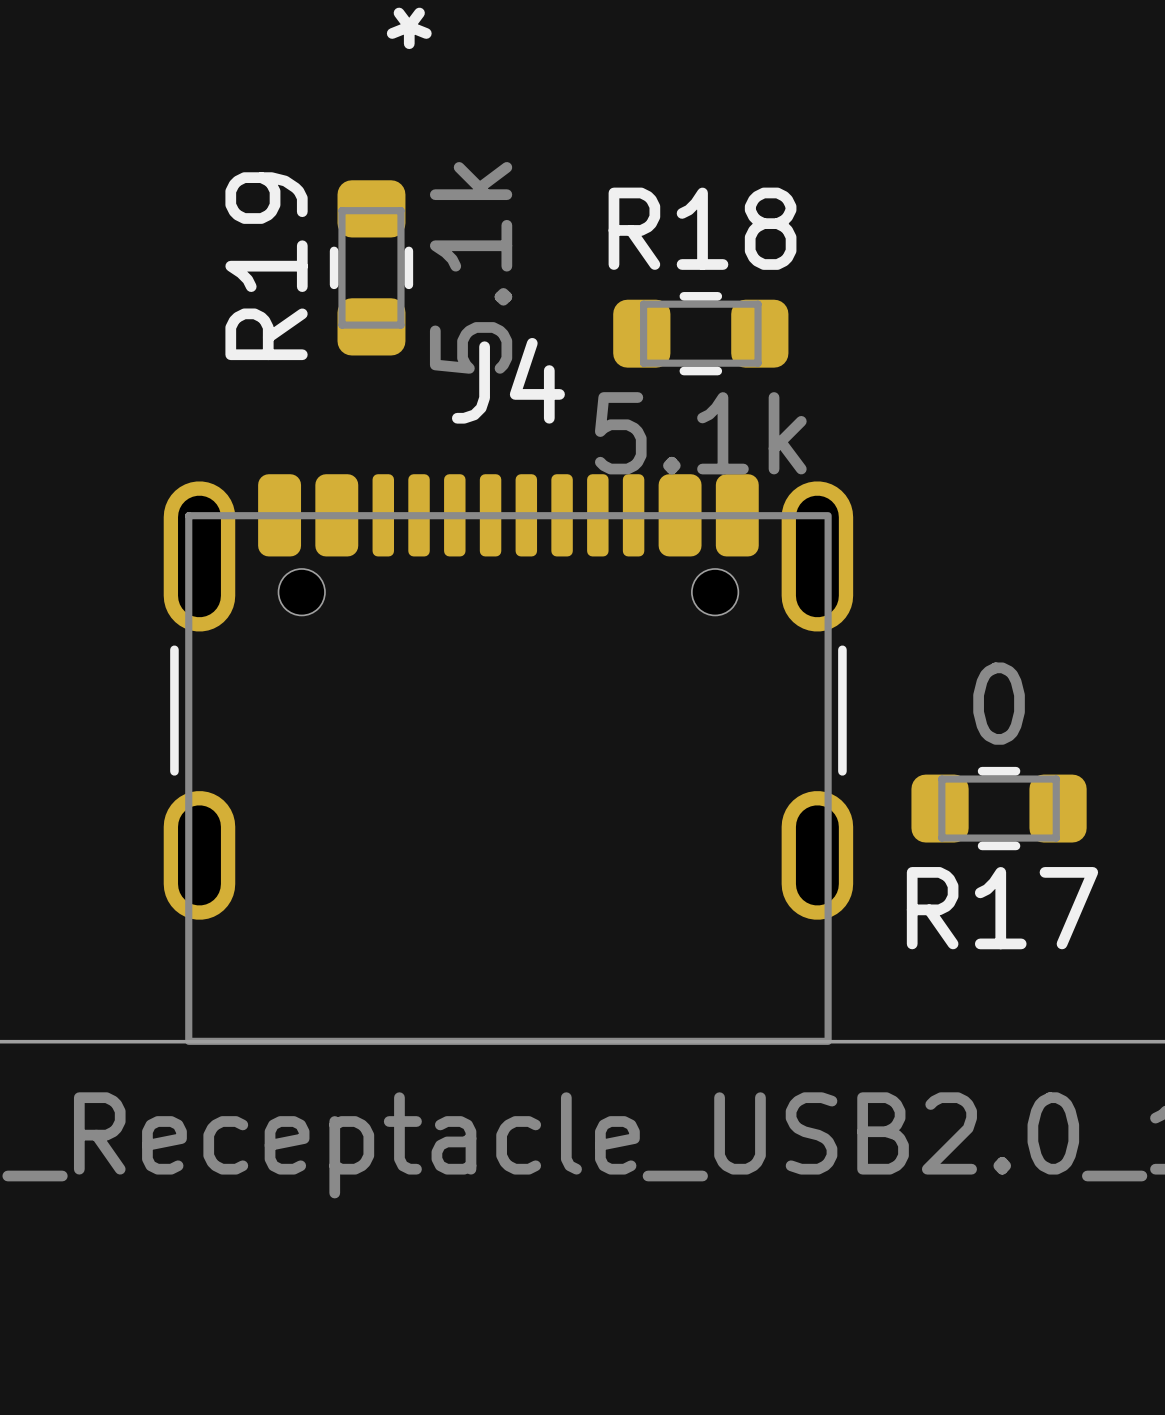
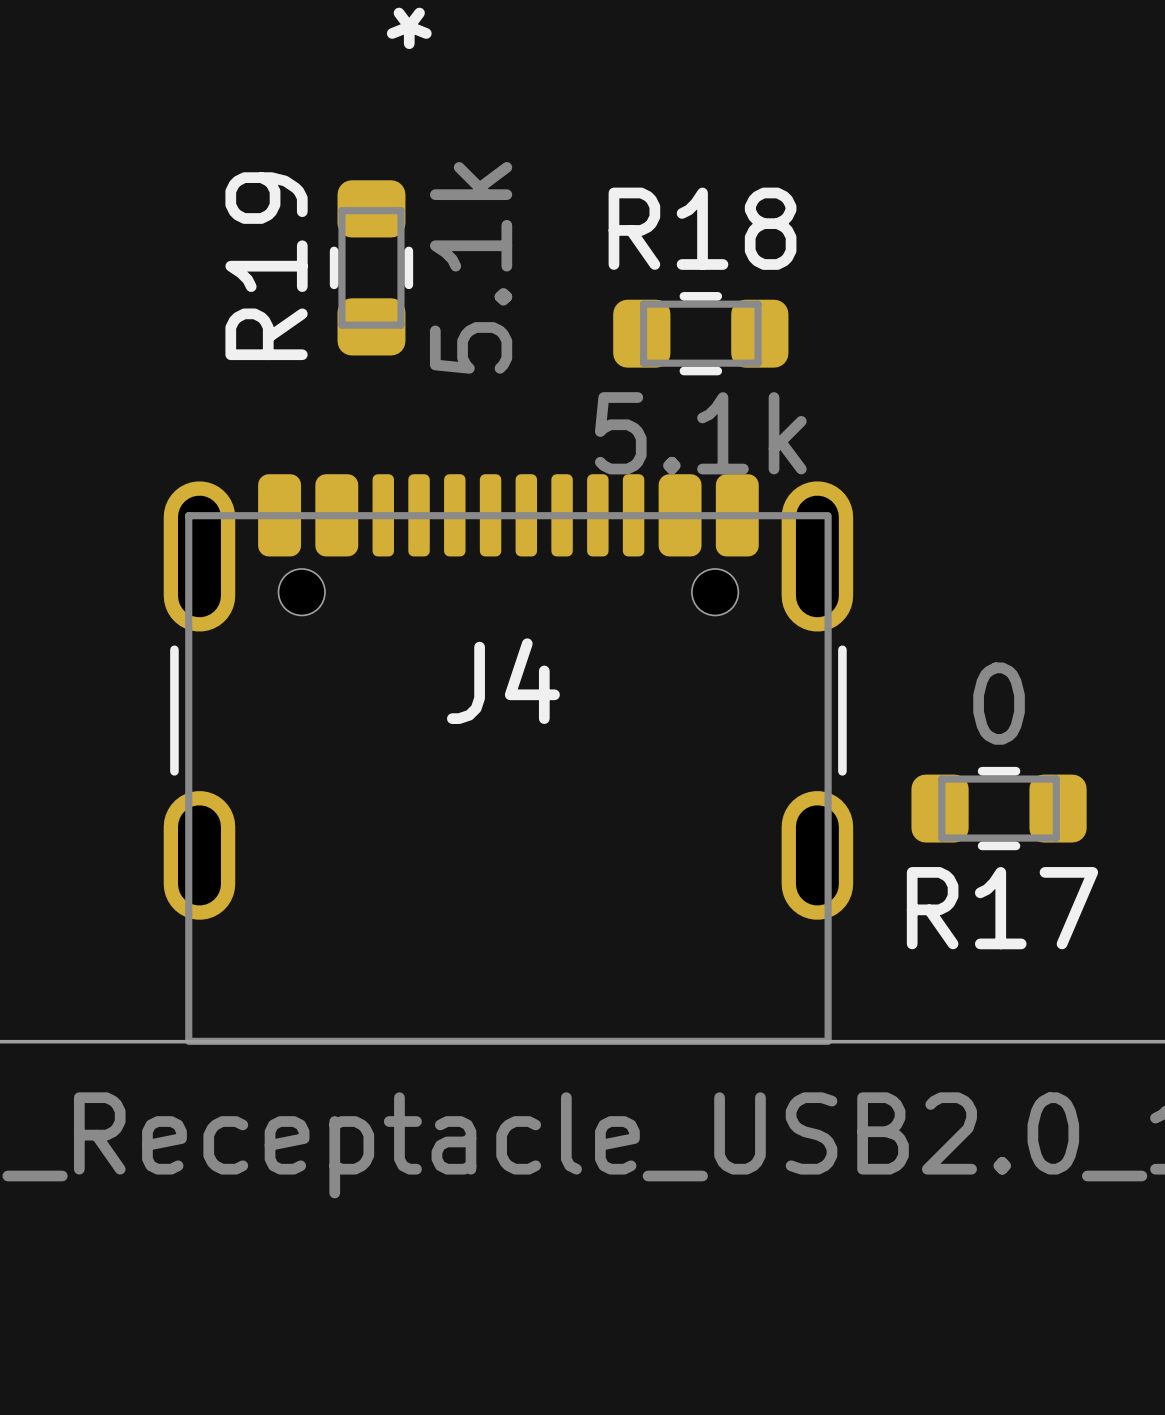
J4 name position: J4 (508, 380) -> J4 (503, 681)

